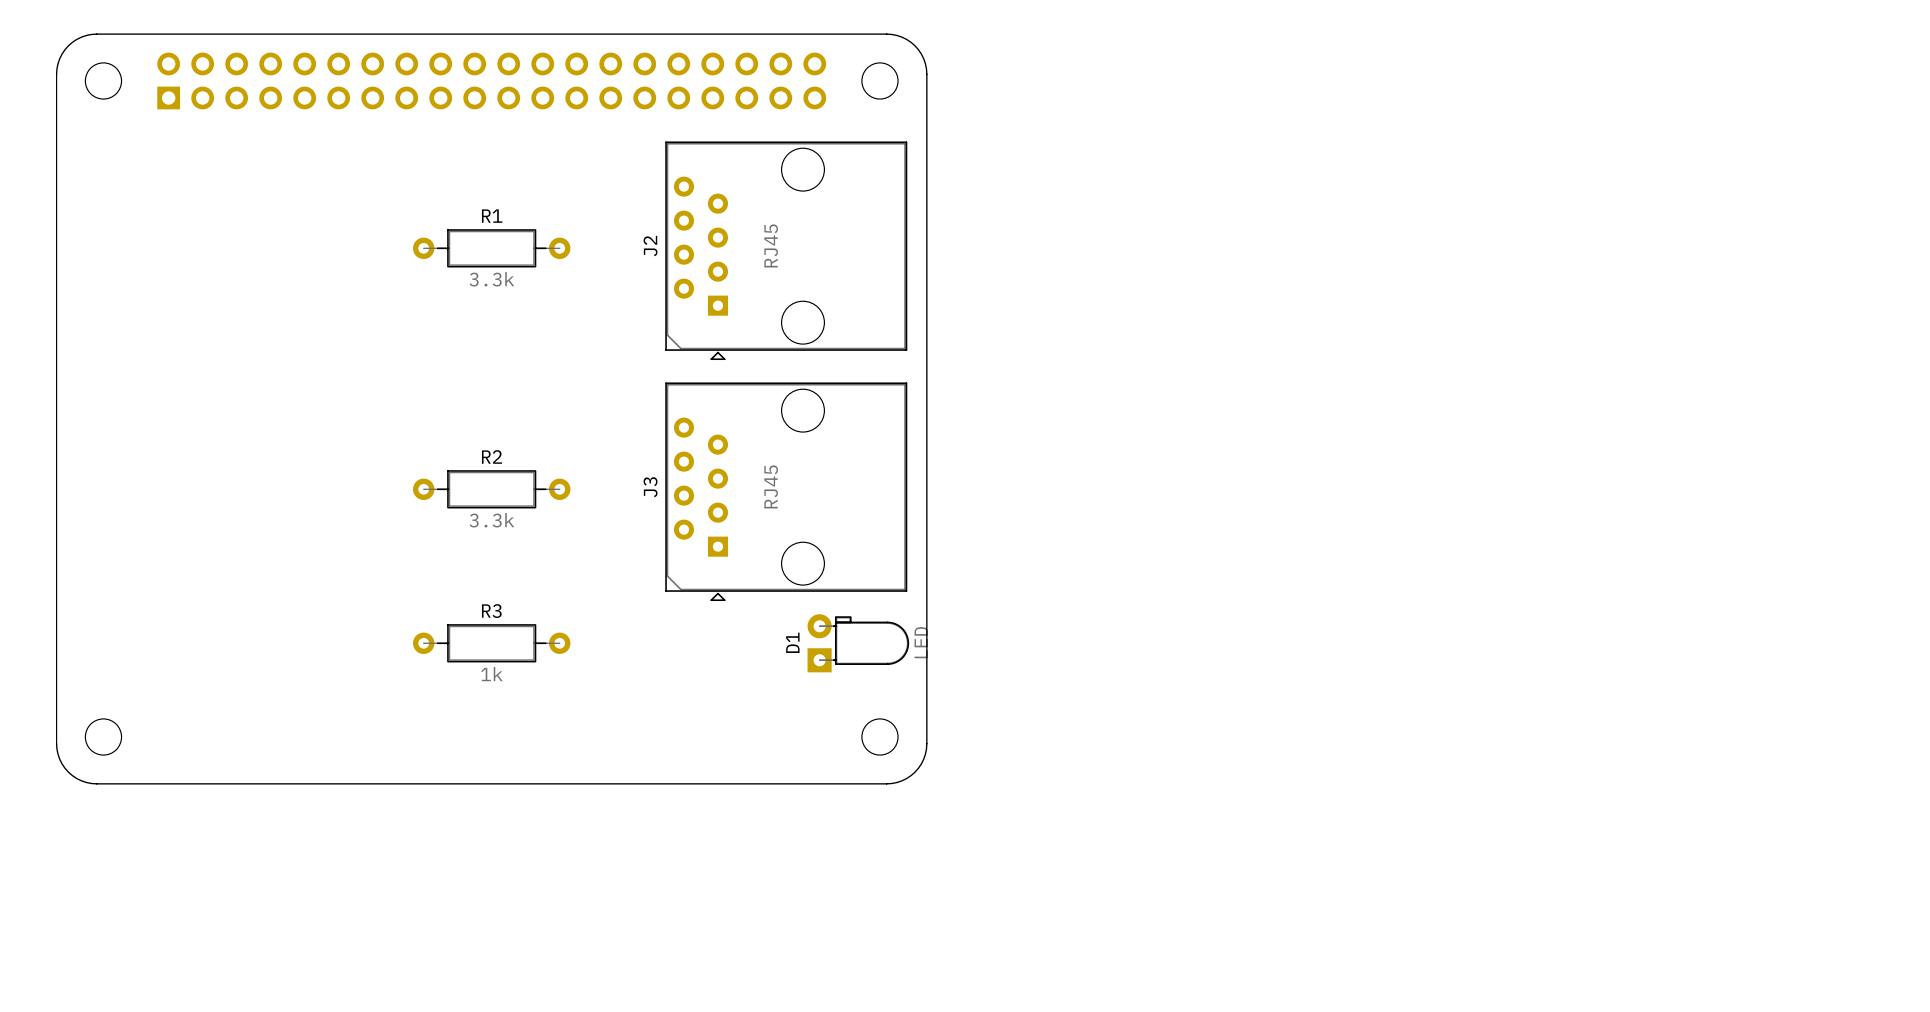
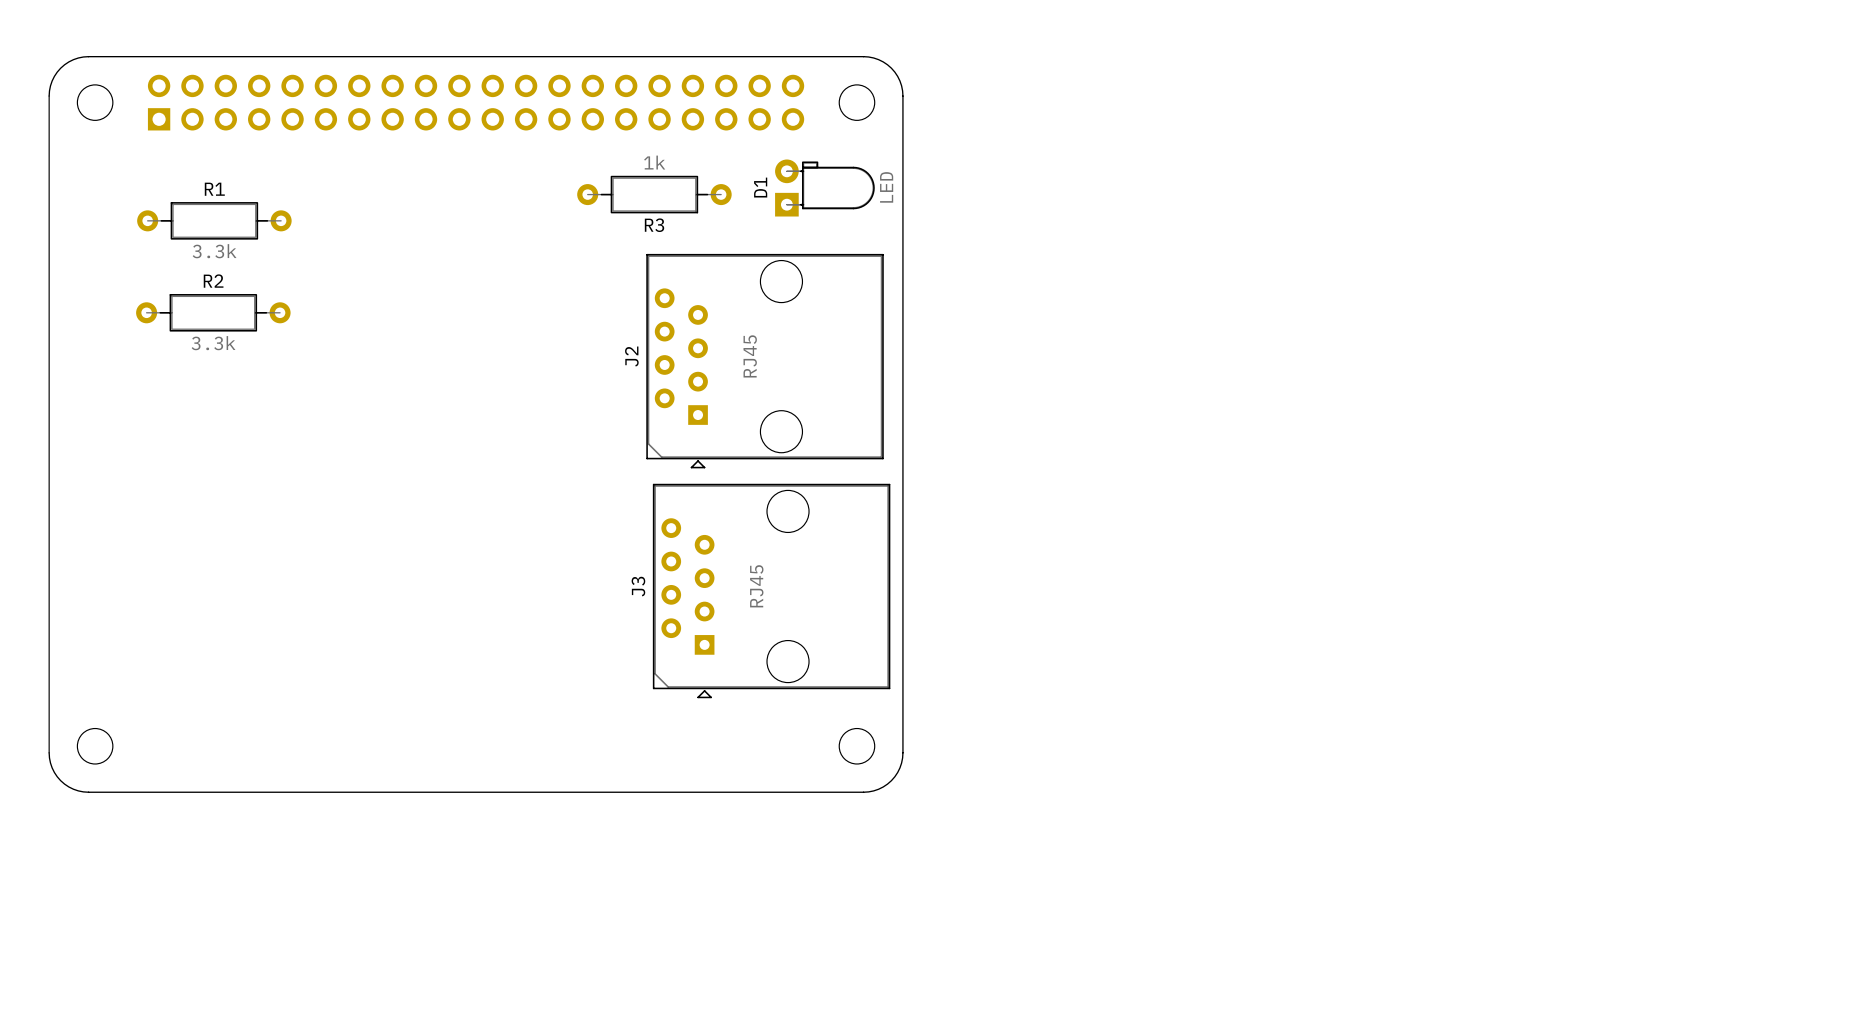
R1 position: (491, 248) -> (214, 220)
J2 position: (786, 250) -> (765, 361)
R2 position: (491, 489) -> (213, 312)
J3 position: (786, 491) -> (771, 591)
R3 name position: R3 (491, 611) -> R3 (654, 225)
R3 position: (491, 643) -> (654, 194)
D1 position: (858, 643) -> (824, 188)
R3 value position: 1k (491, 674) -> 1k (654, 162)

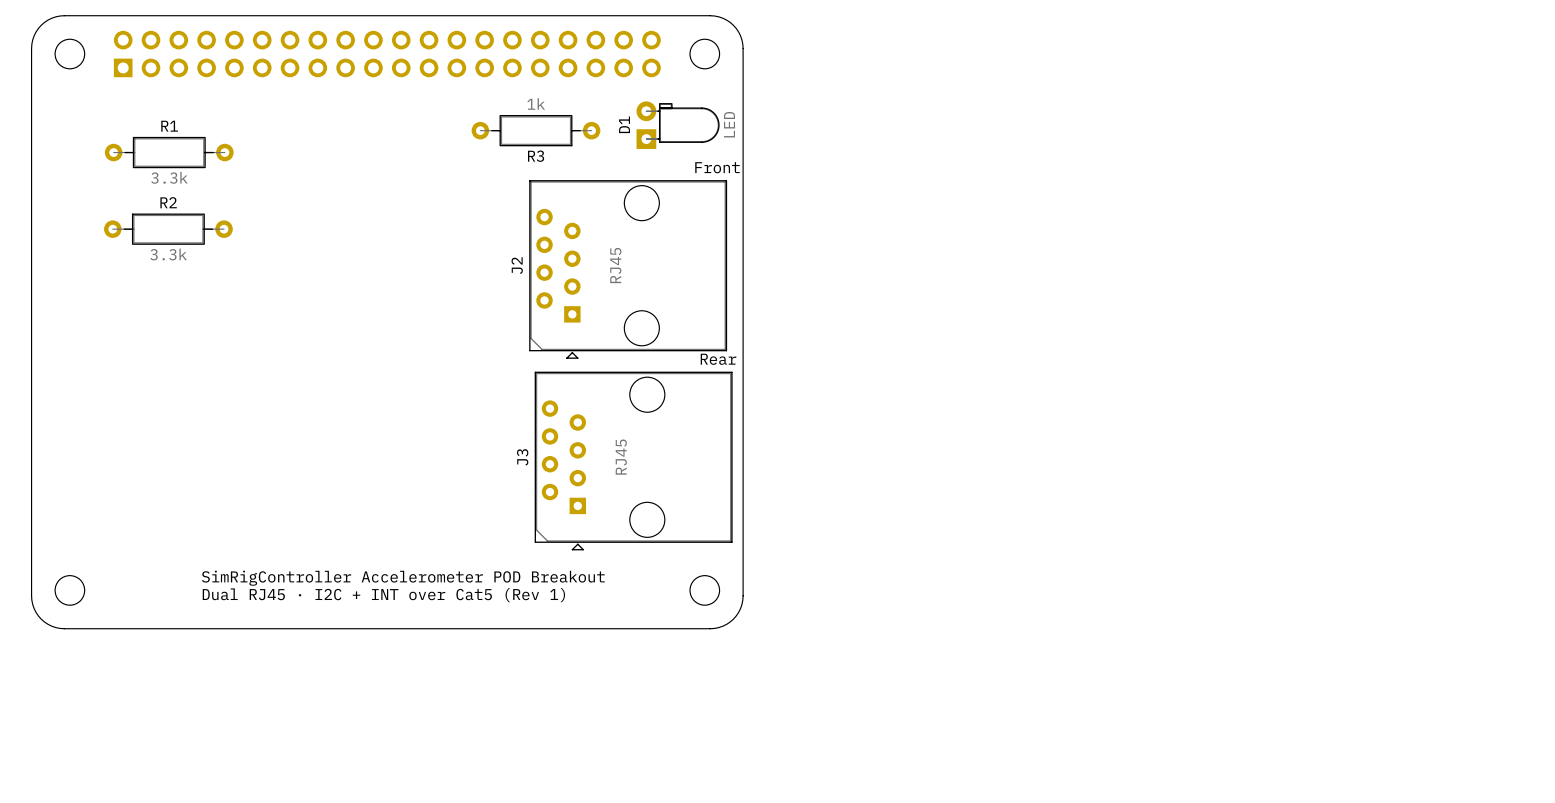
text: none -> Front (717, 167)
text: none -> Rear (718, 359)
text: none -> SimRigController Accelerometer POD Breakout (403, 578)
text: none -> Dual RJ45 · I2C + INT over Cat5 (Rev 1) (383, 595)

